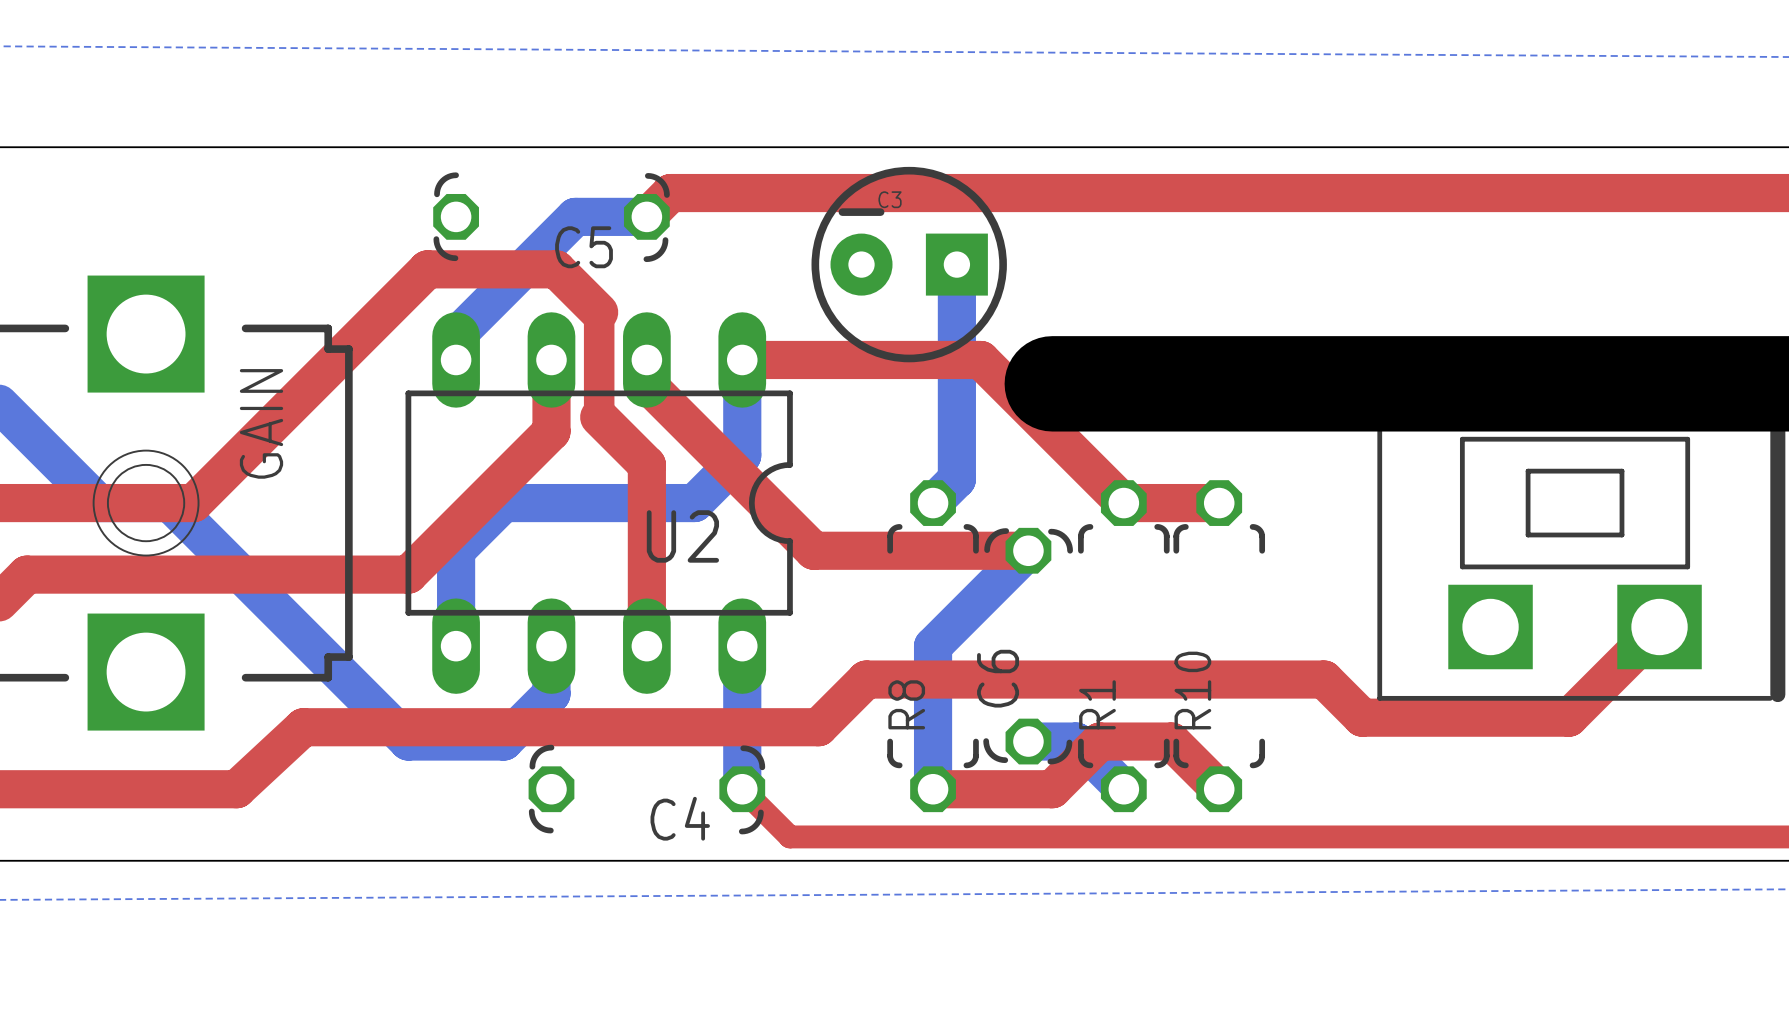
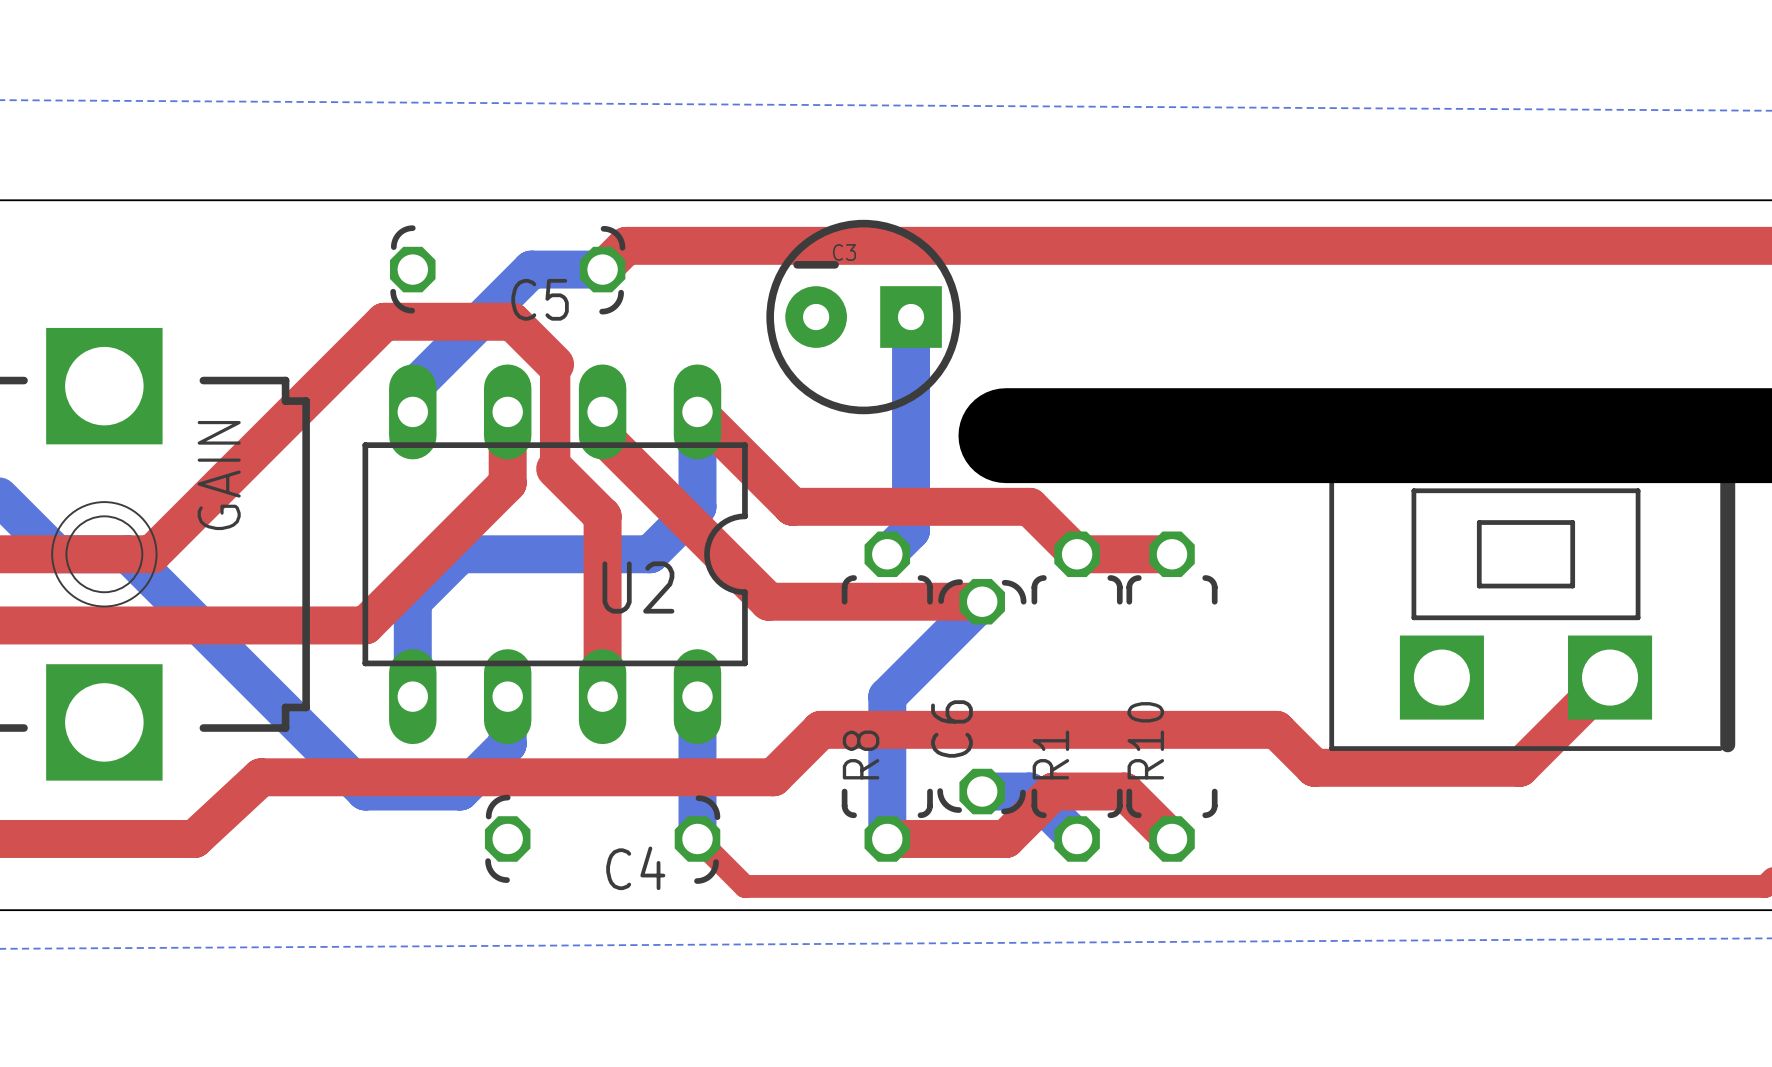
top track: (742, 359) (980, 359) (1076, 455) -> (697, 411) (792, 506) (1029, 506)

